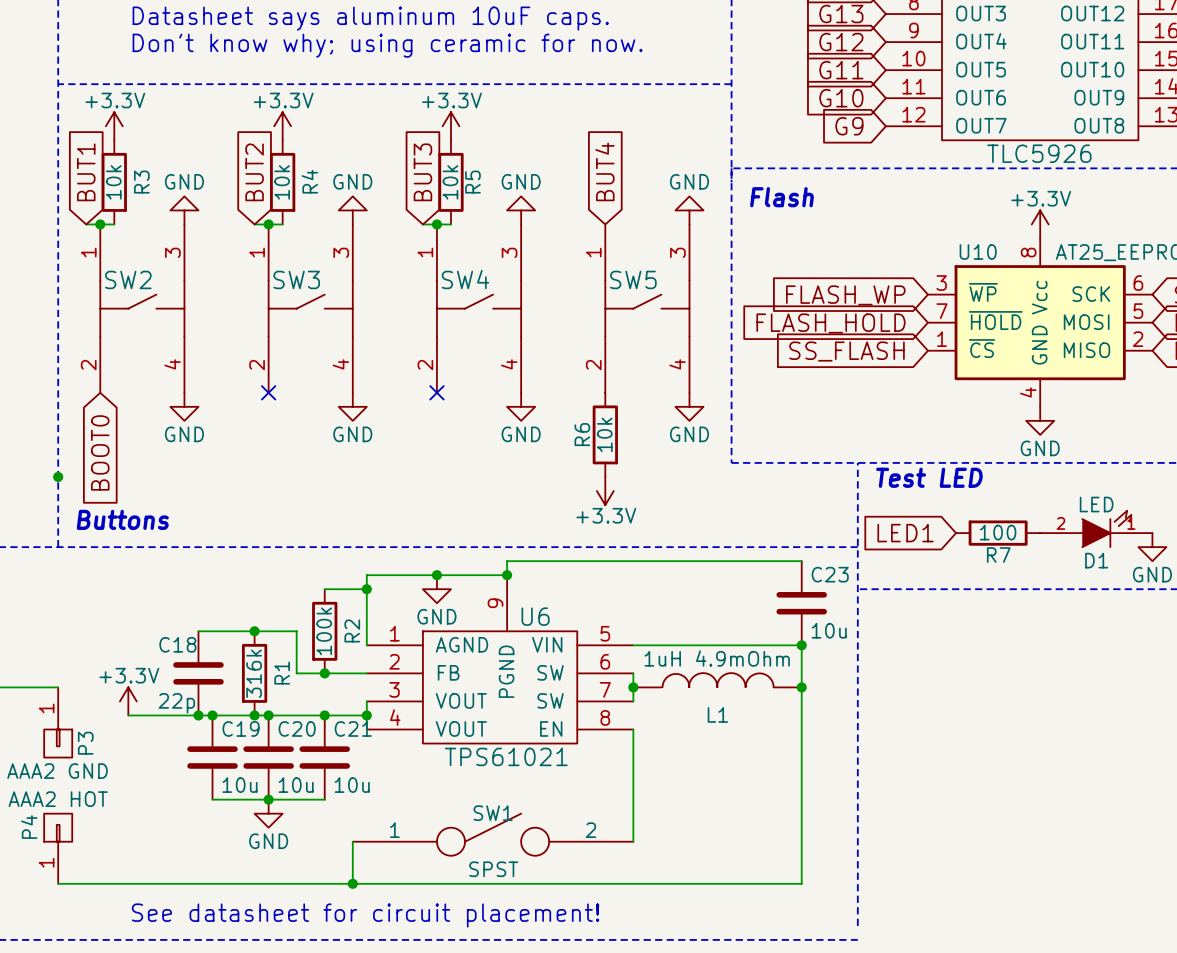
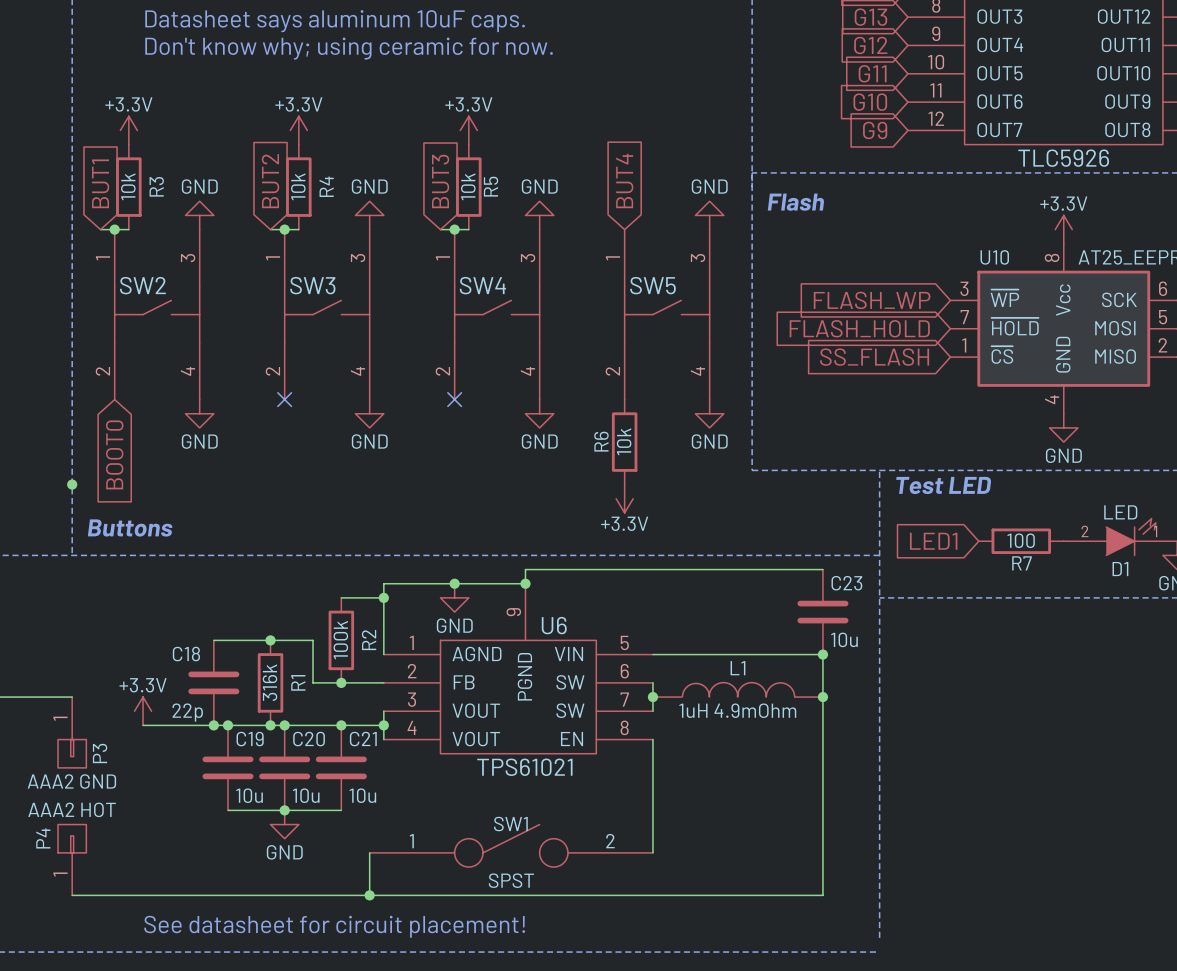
line: (58, 84) (731, 84) -> none
L1 value position: 1uH 4.9mOhm (717, 658) -> 1uH 4.9mOhm (737, 710)
L1 name position: L1 (717, 714) -> L1 (737, 668)

